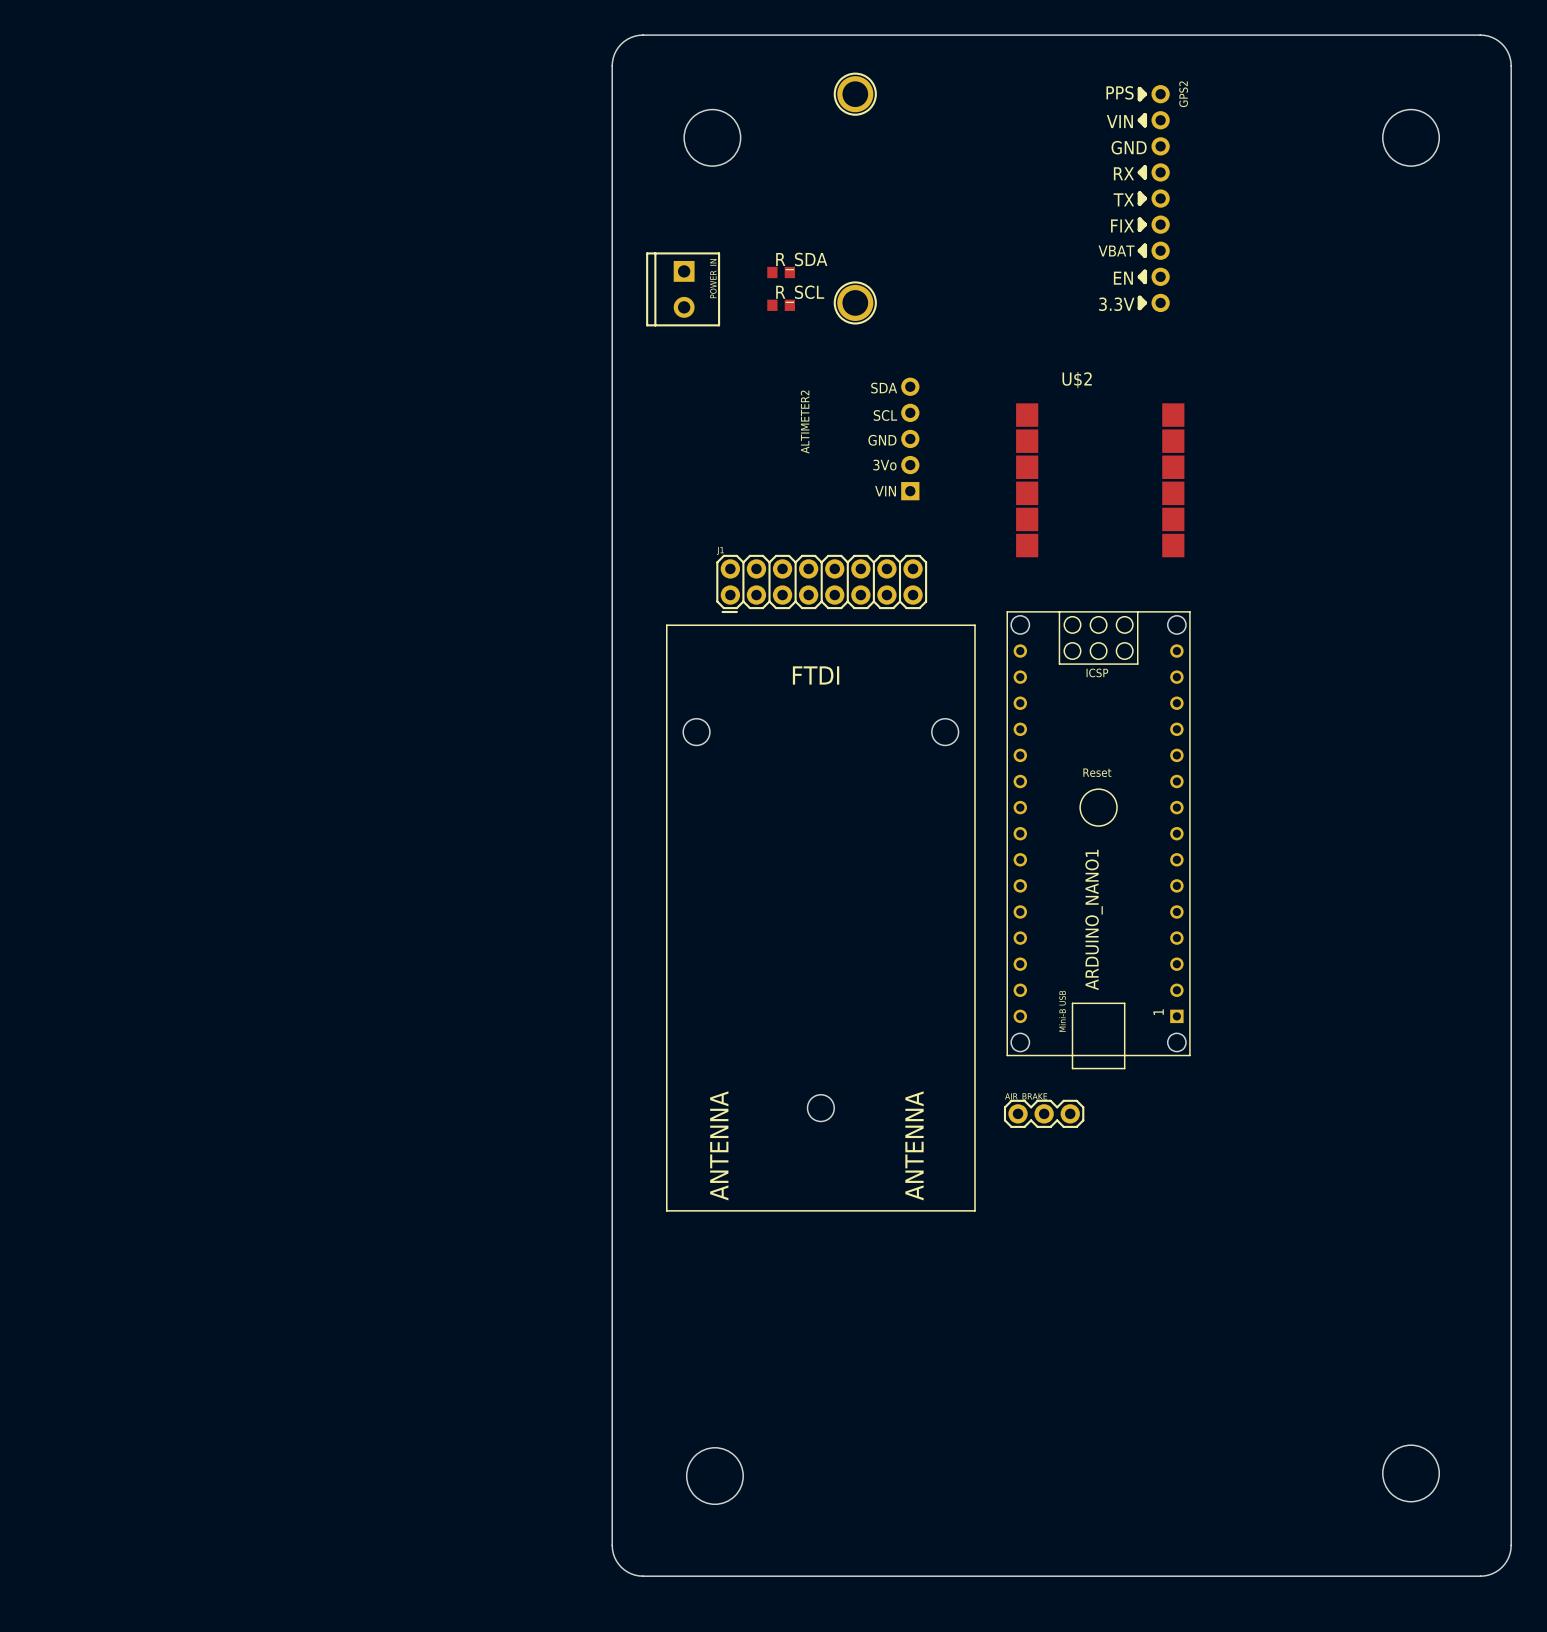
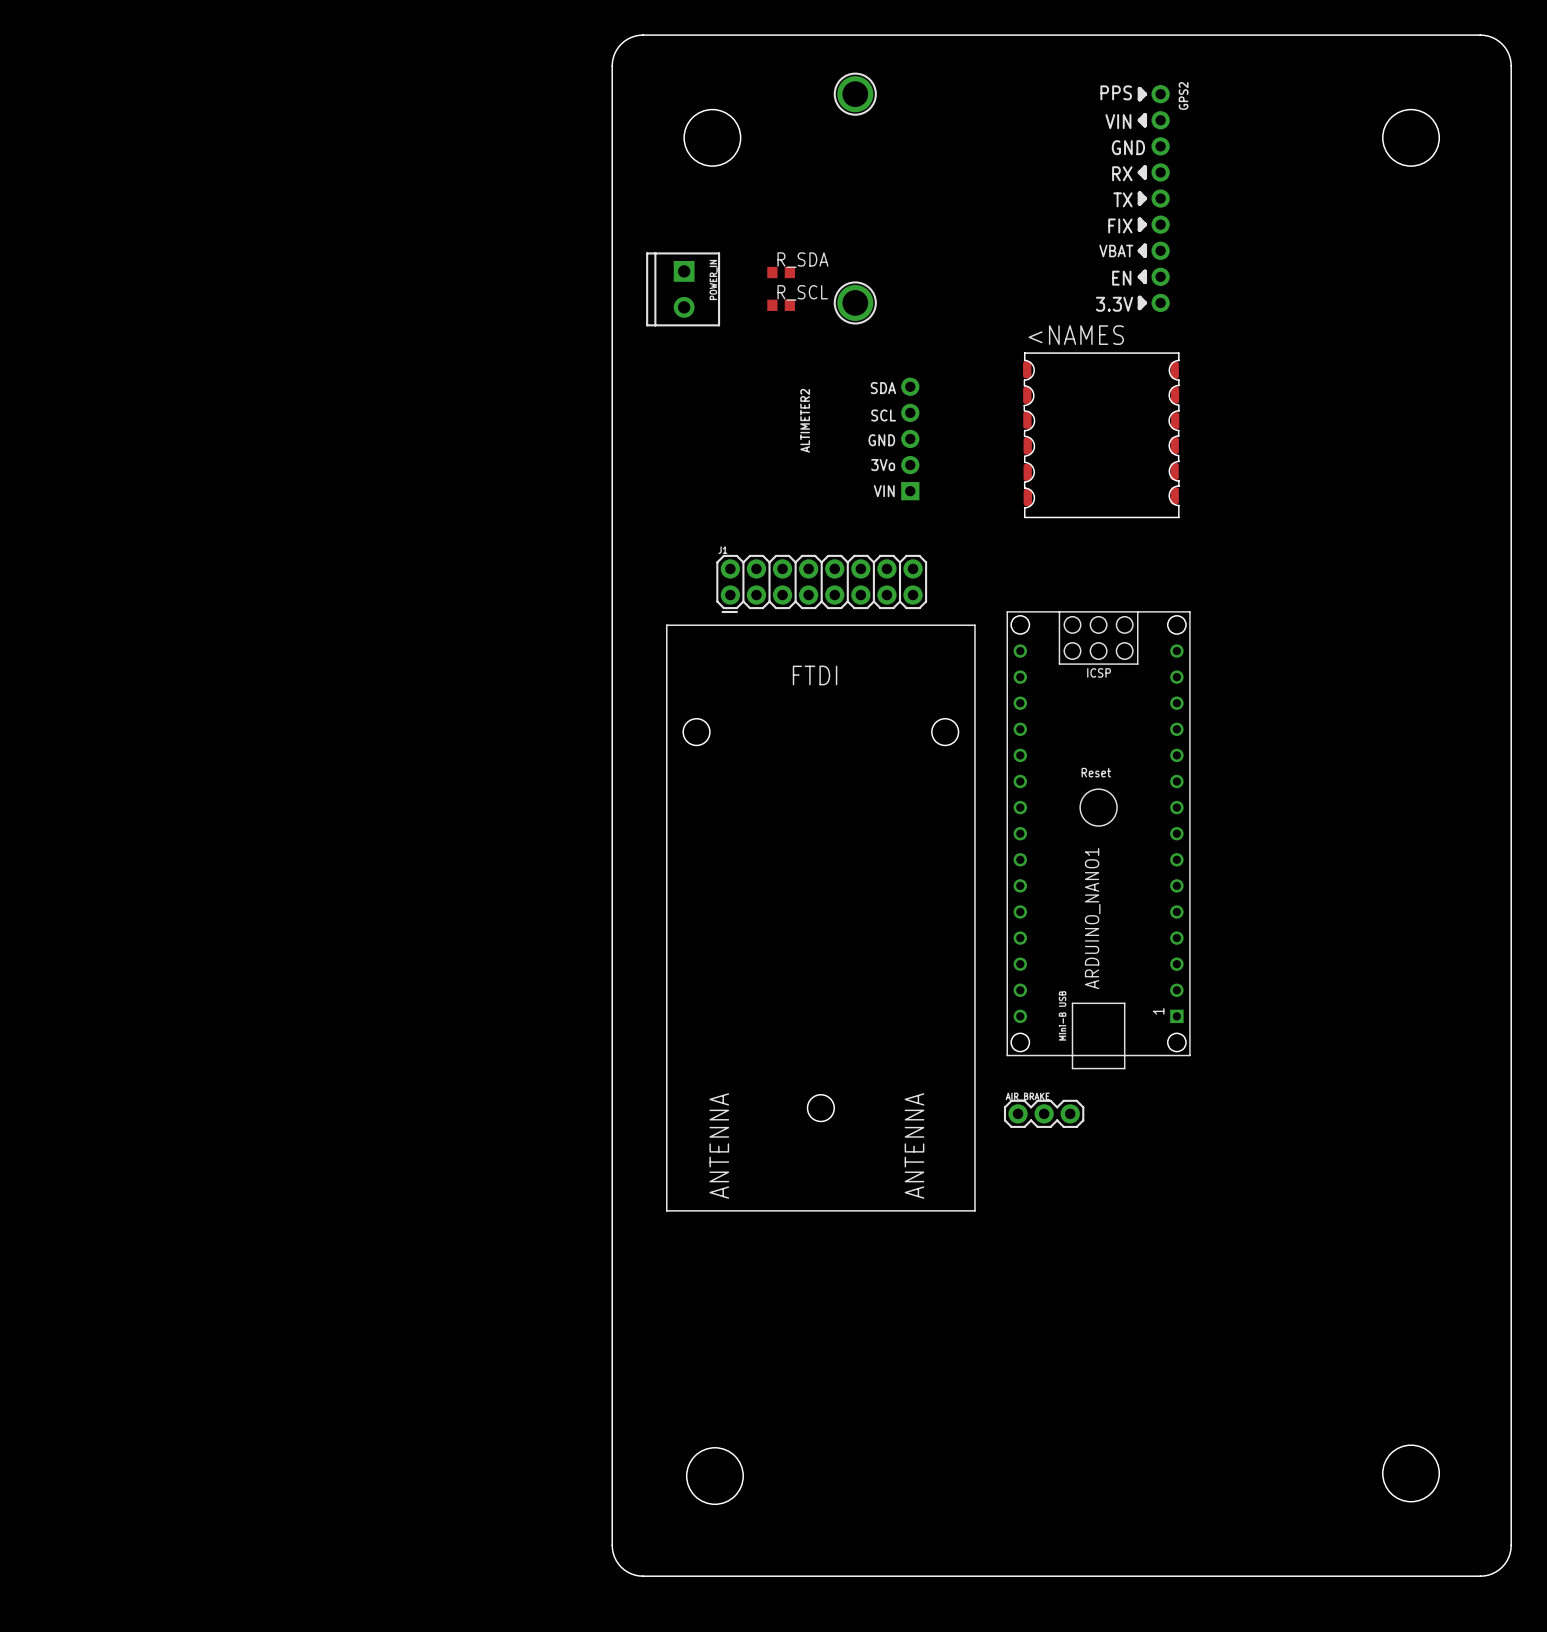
part: none -> (1101, 435)
U$2: (1100, 480) -> none

